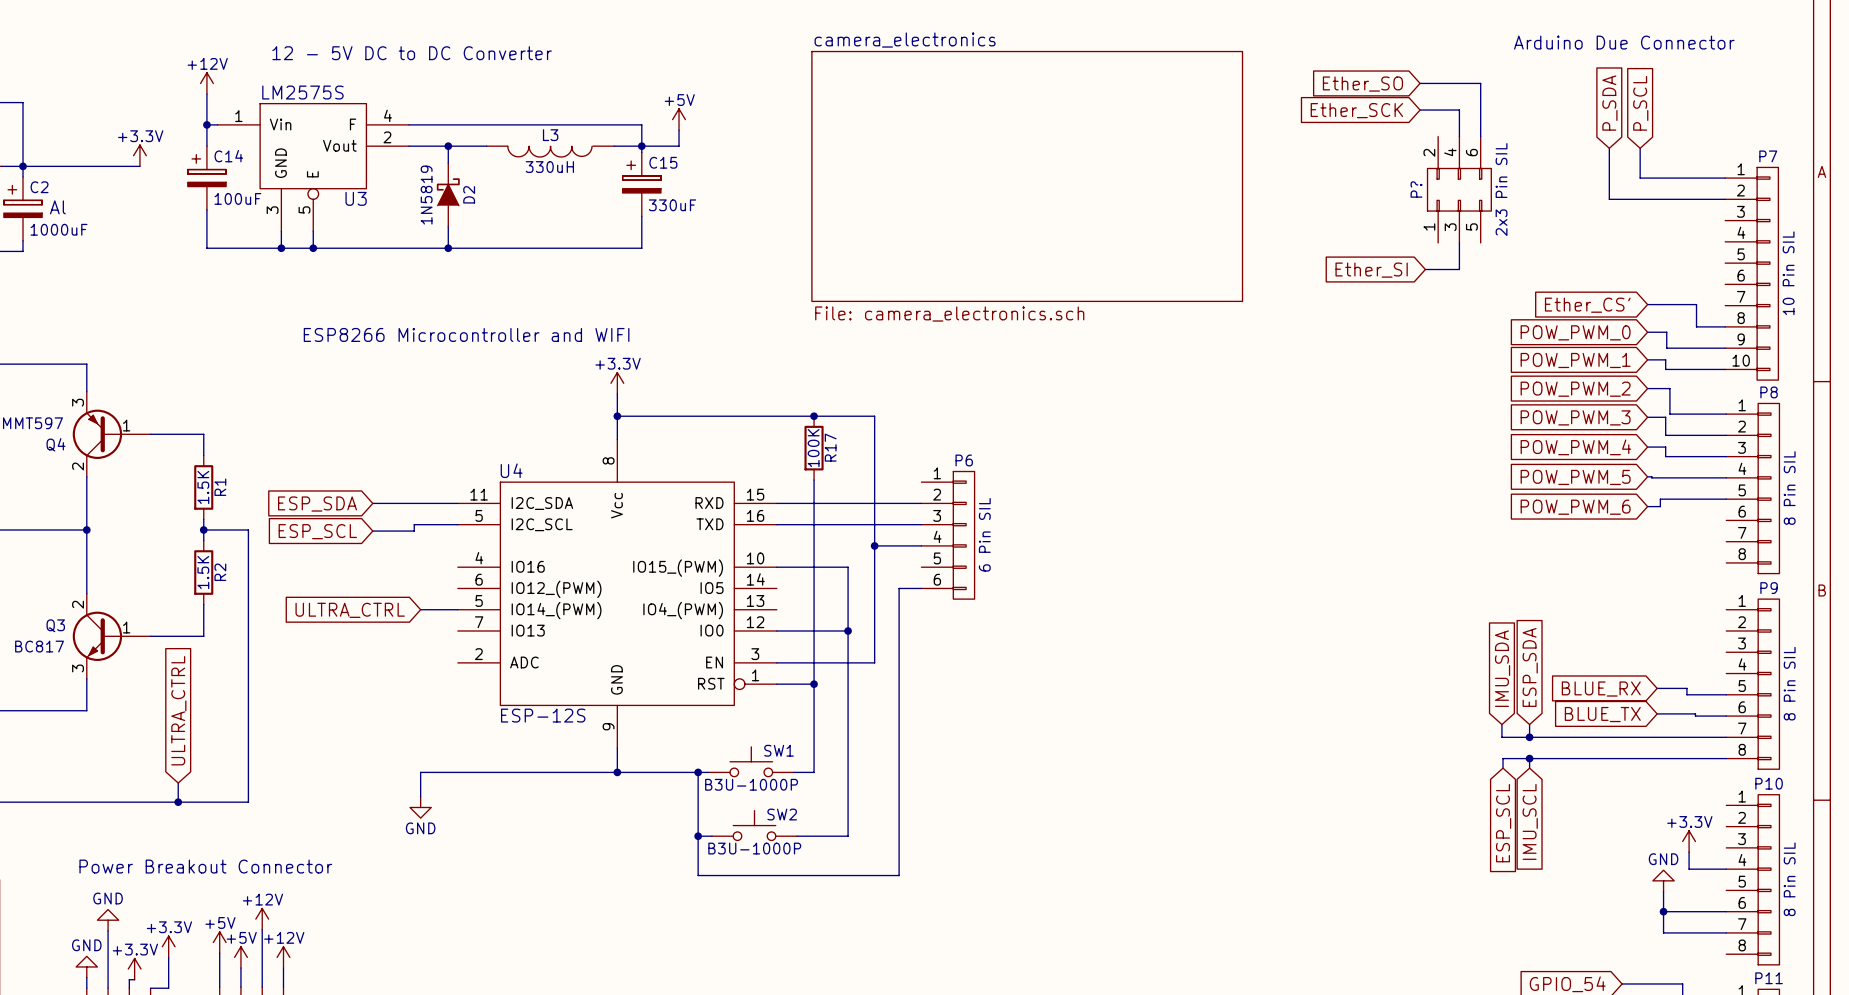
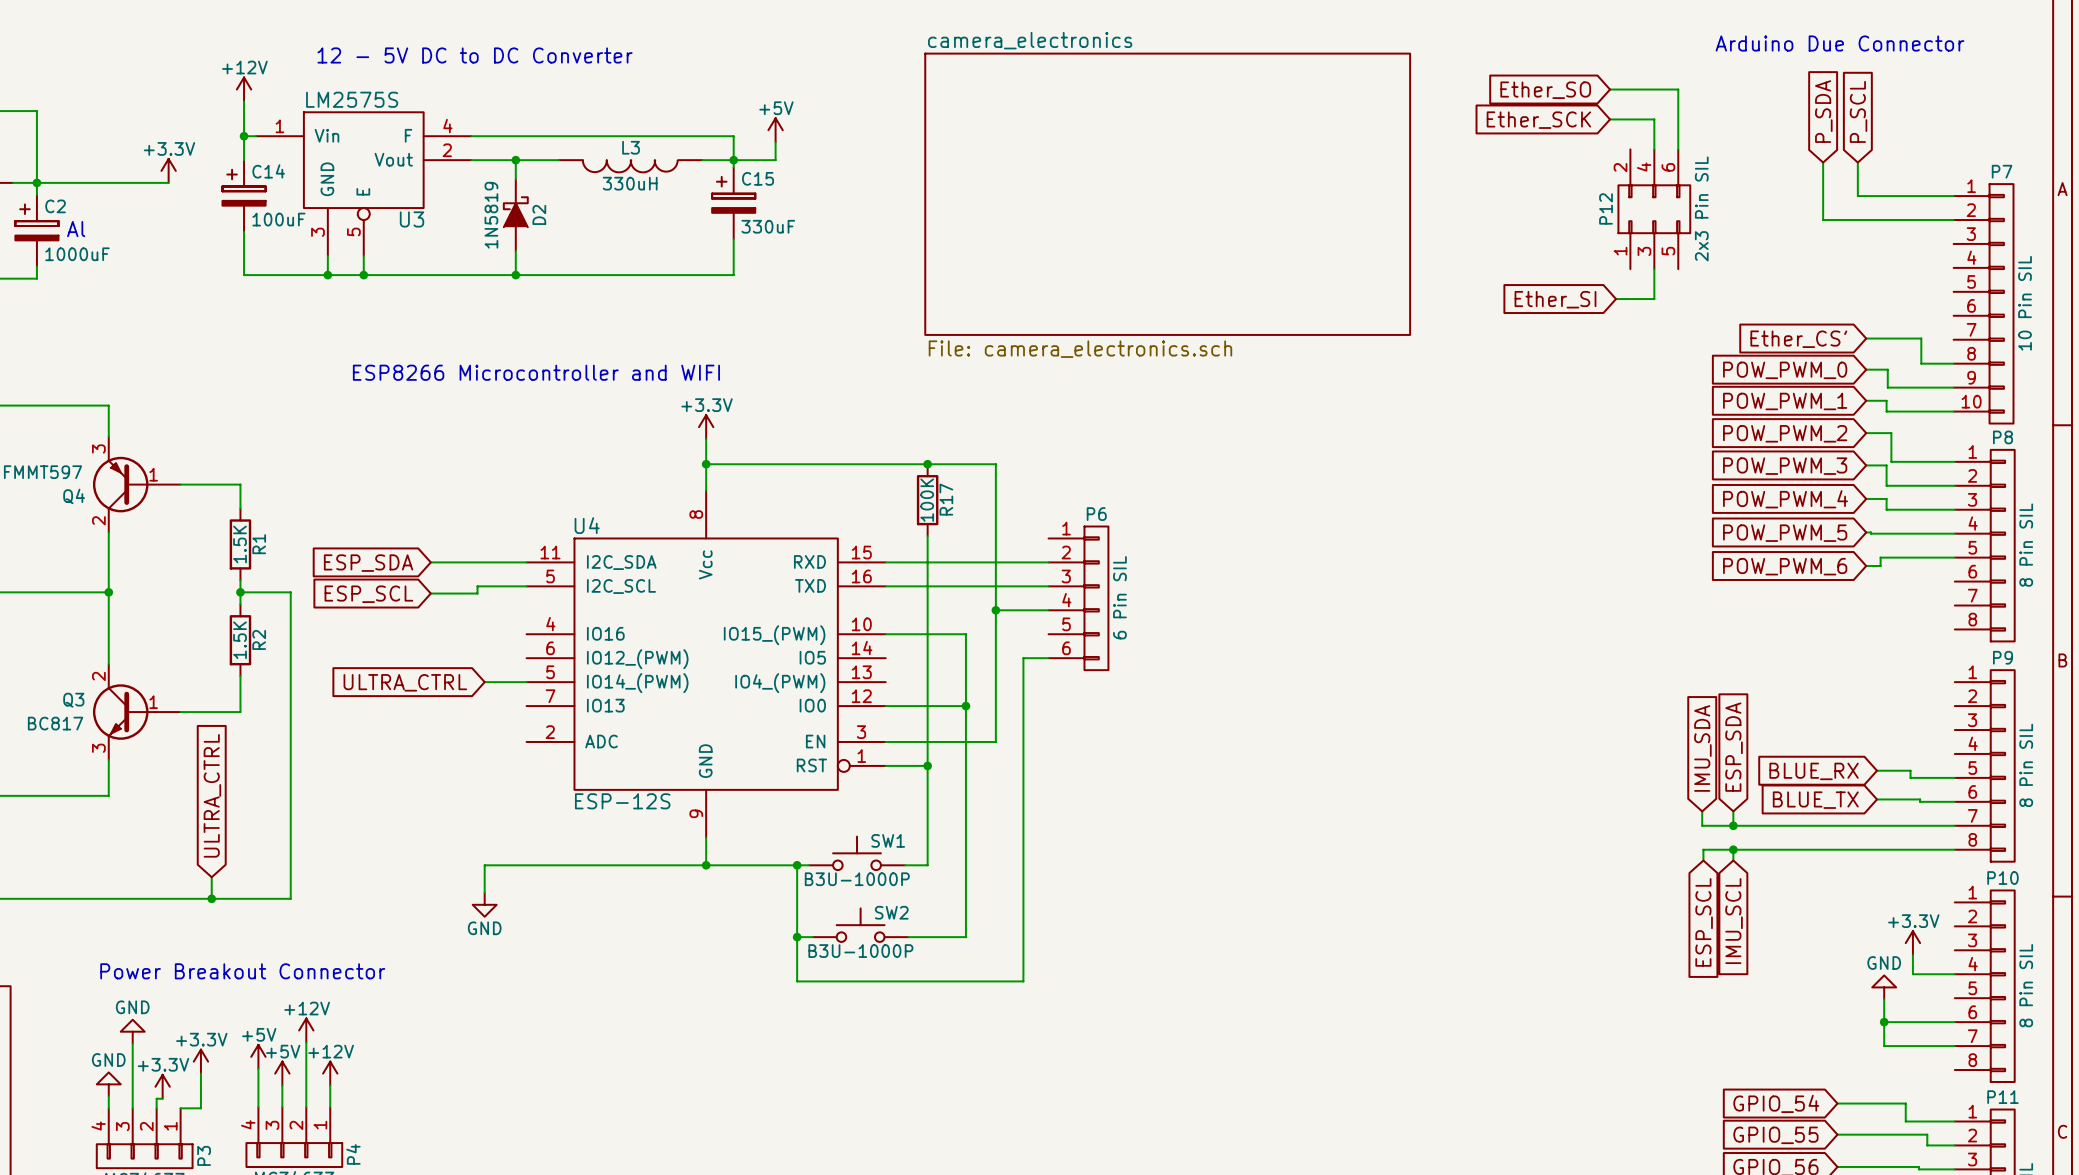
P? name: P? (1416, 189) -> P12 (1606, 208)

